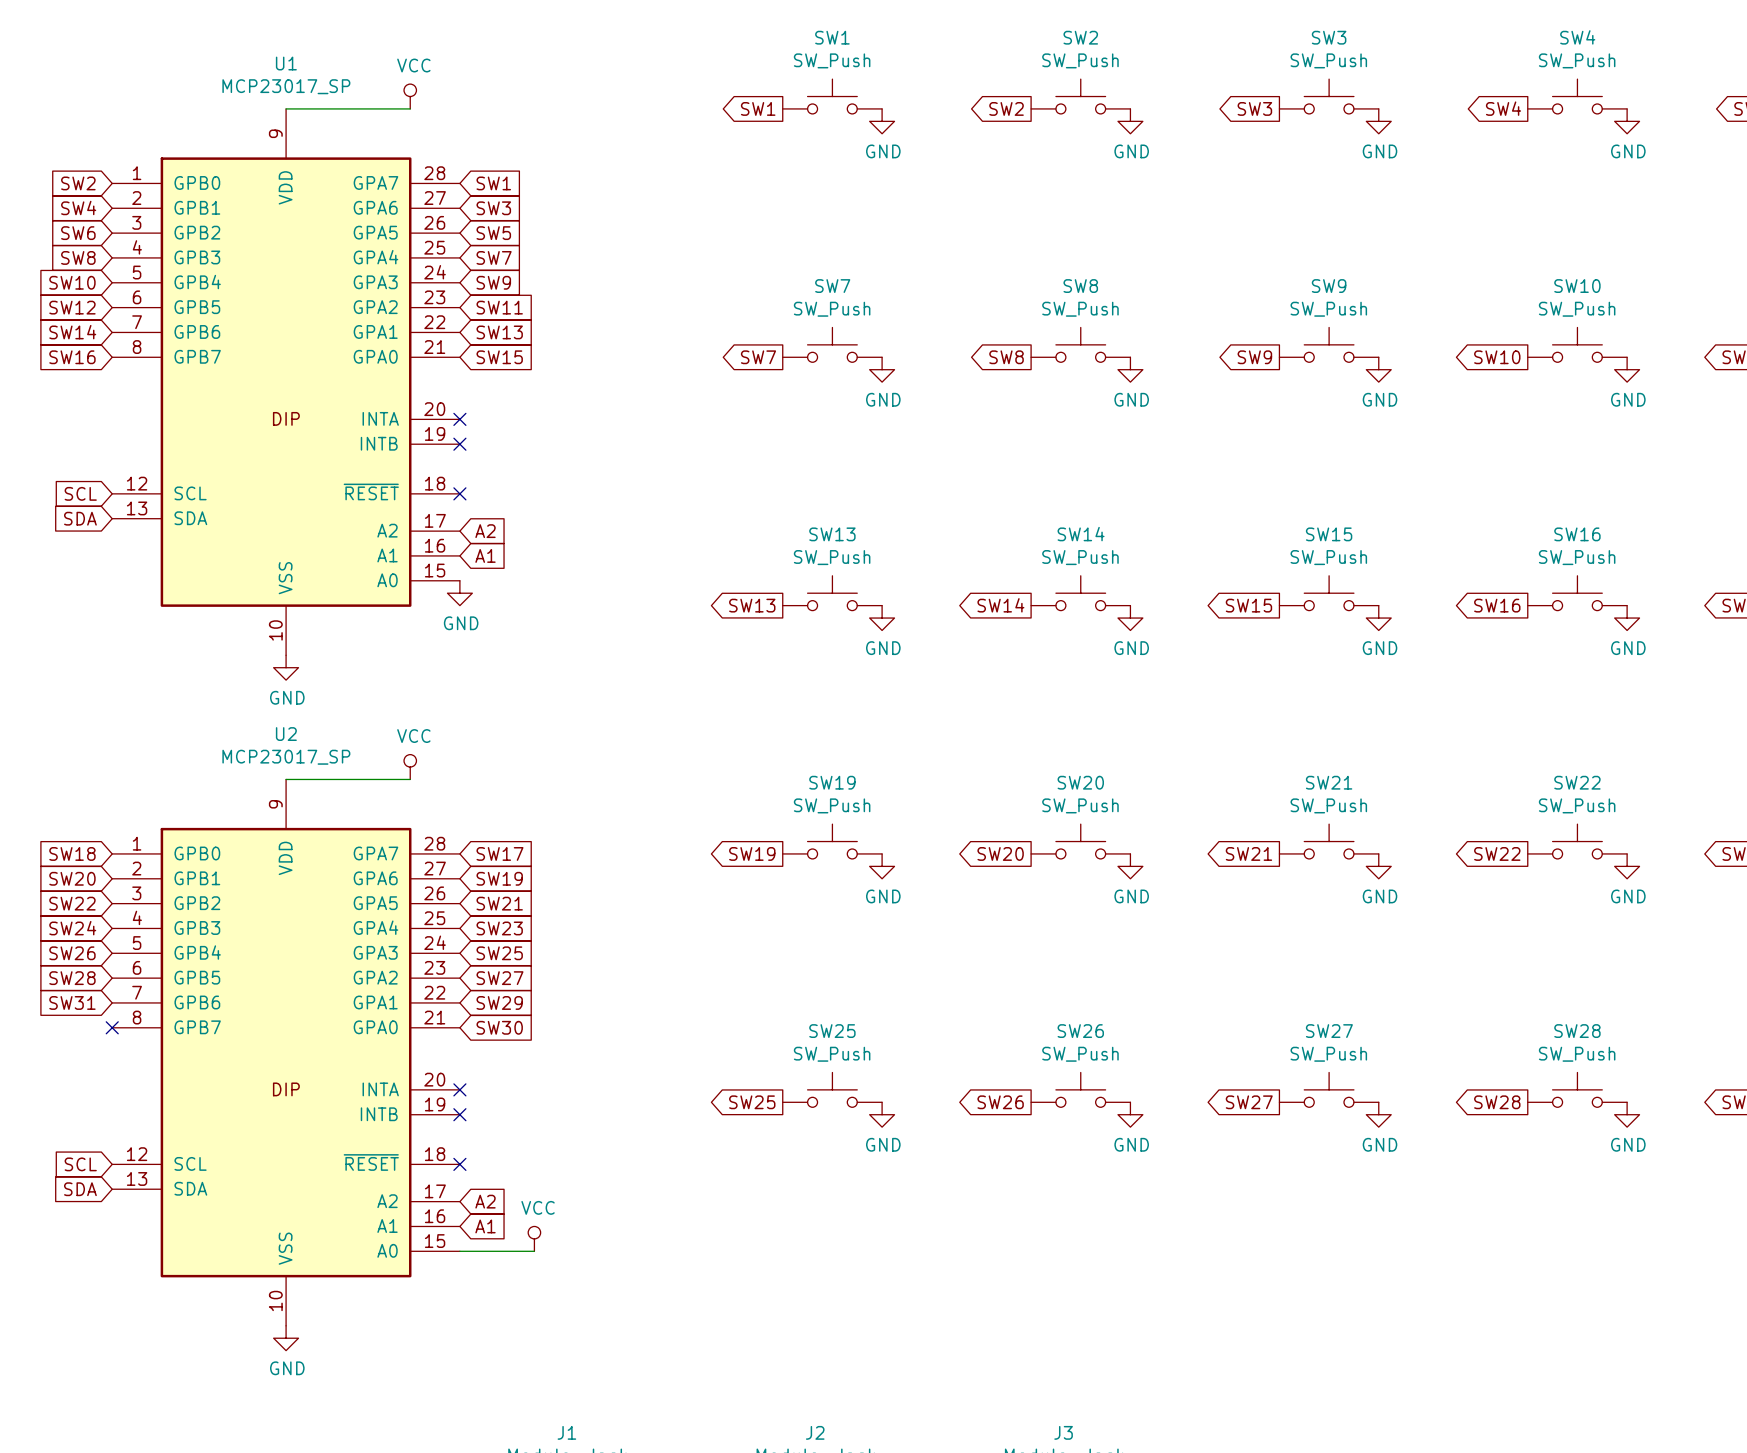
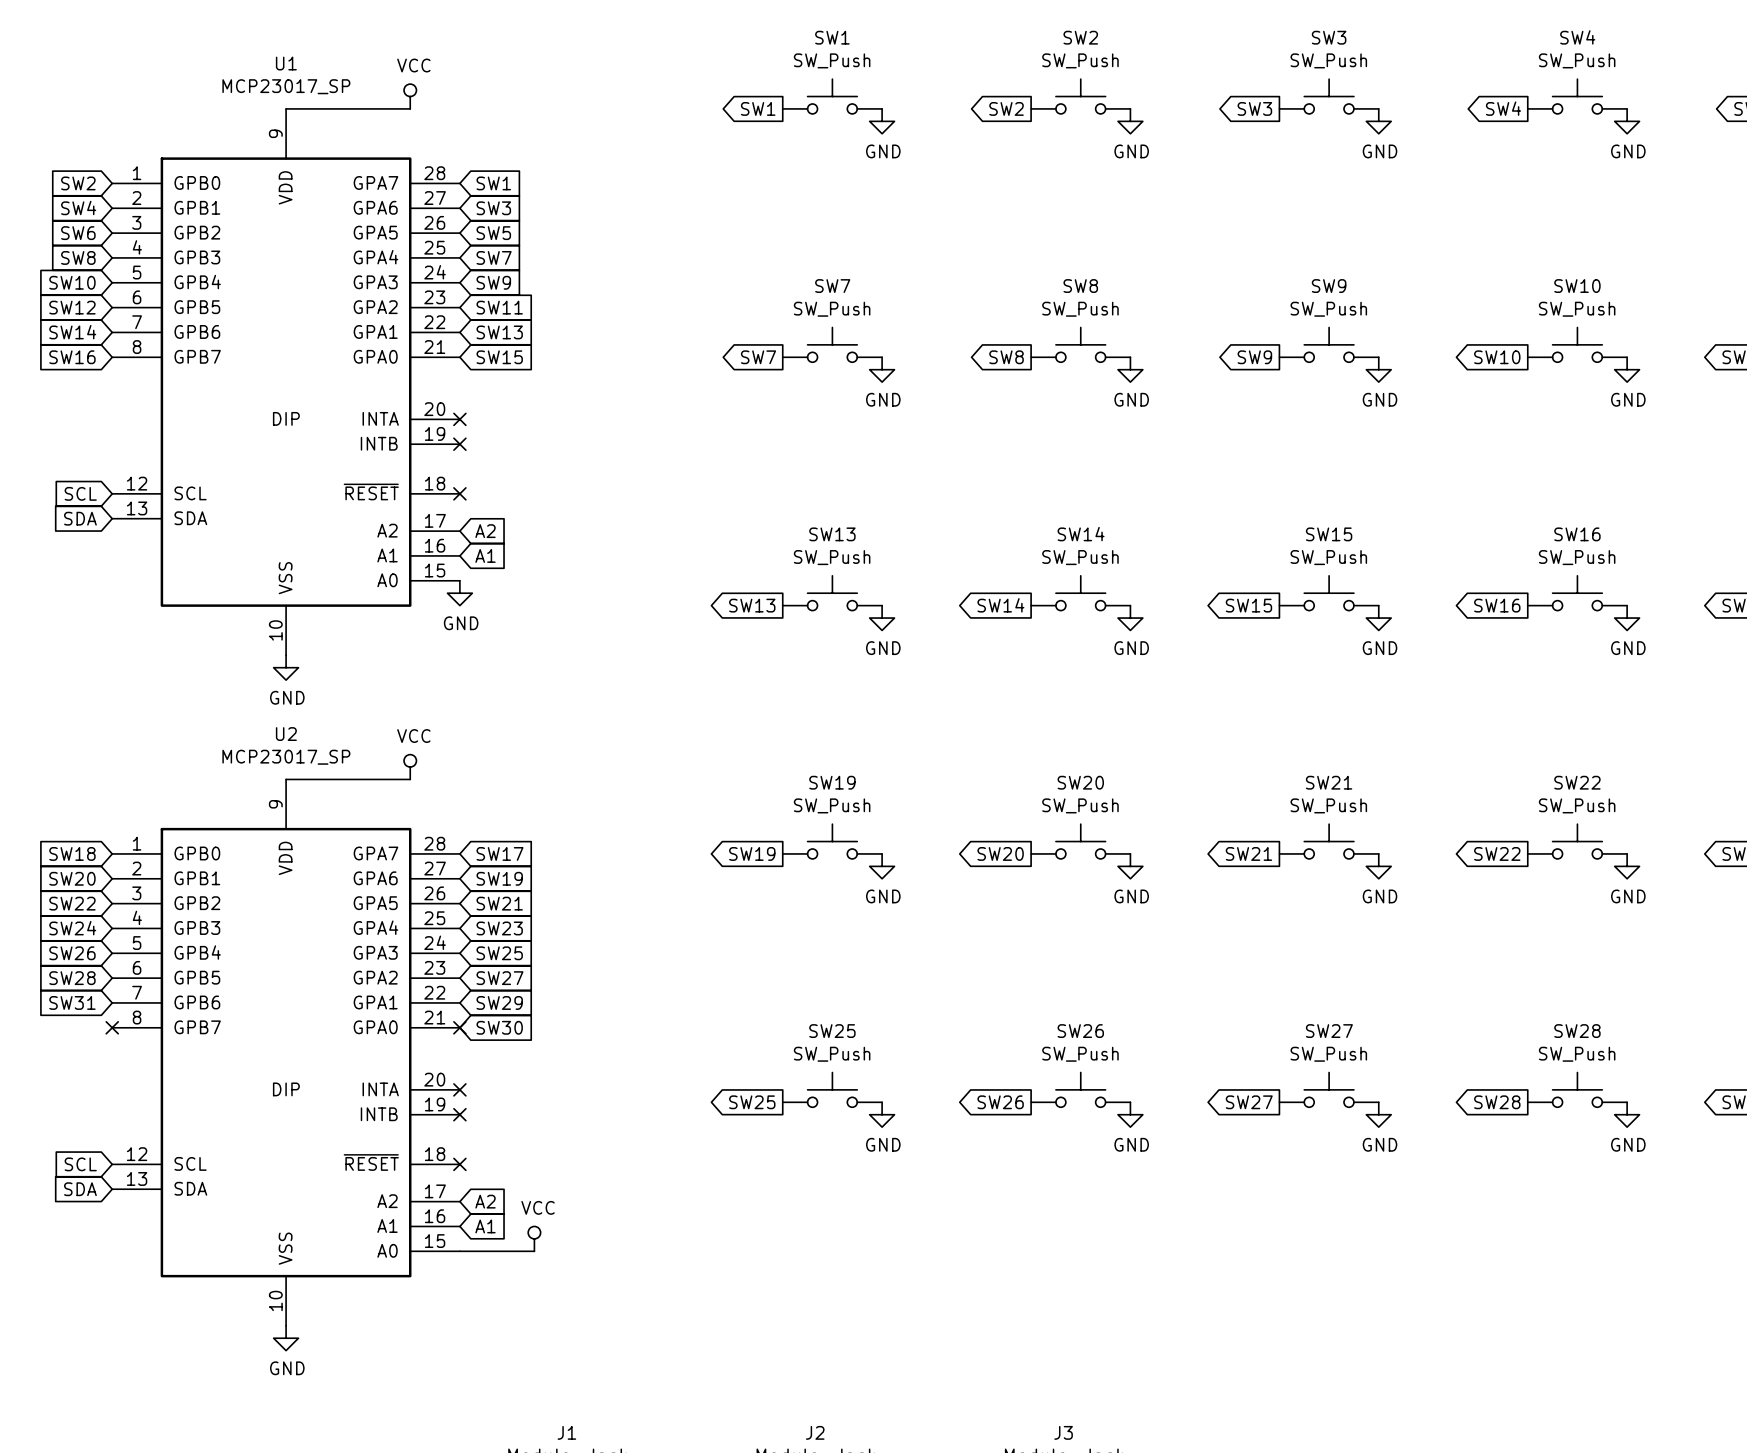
no-connect mark: none -> (459, 1027)

